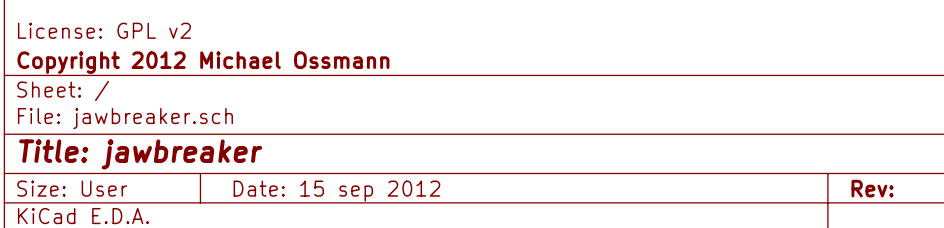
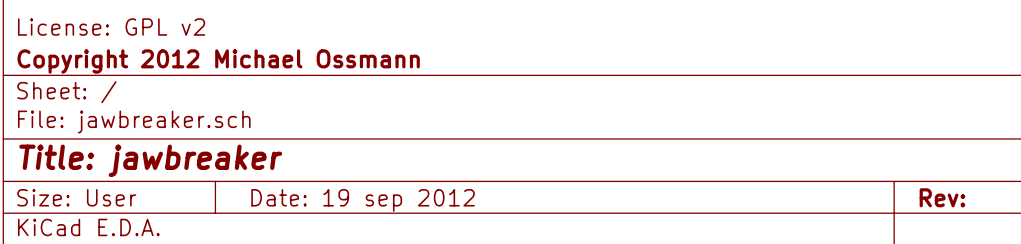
title block: Date: 15 sep 2012 (336, 191) -> Date: 19 sep 2012 (363, 200)

